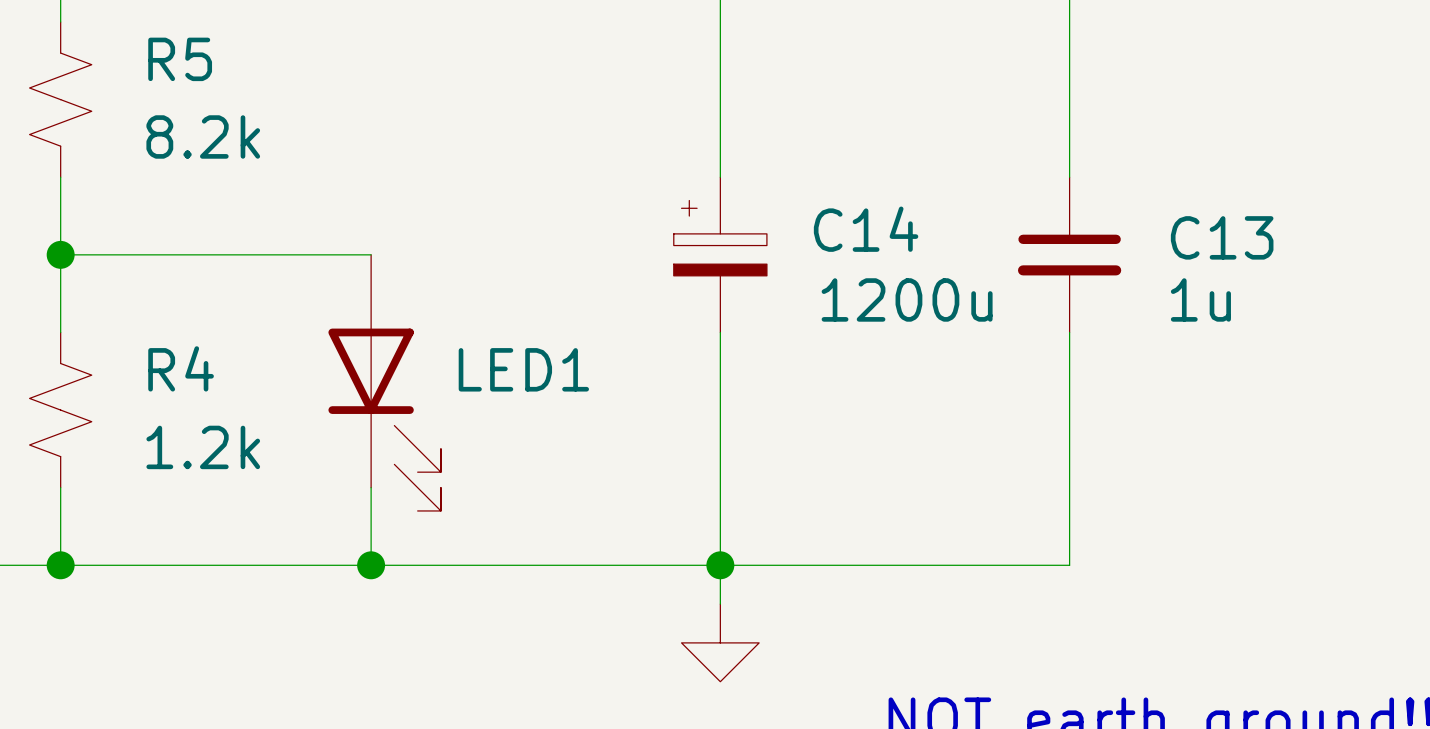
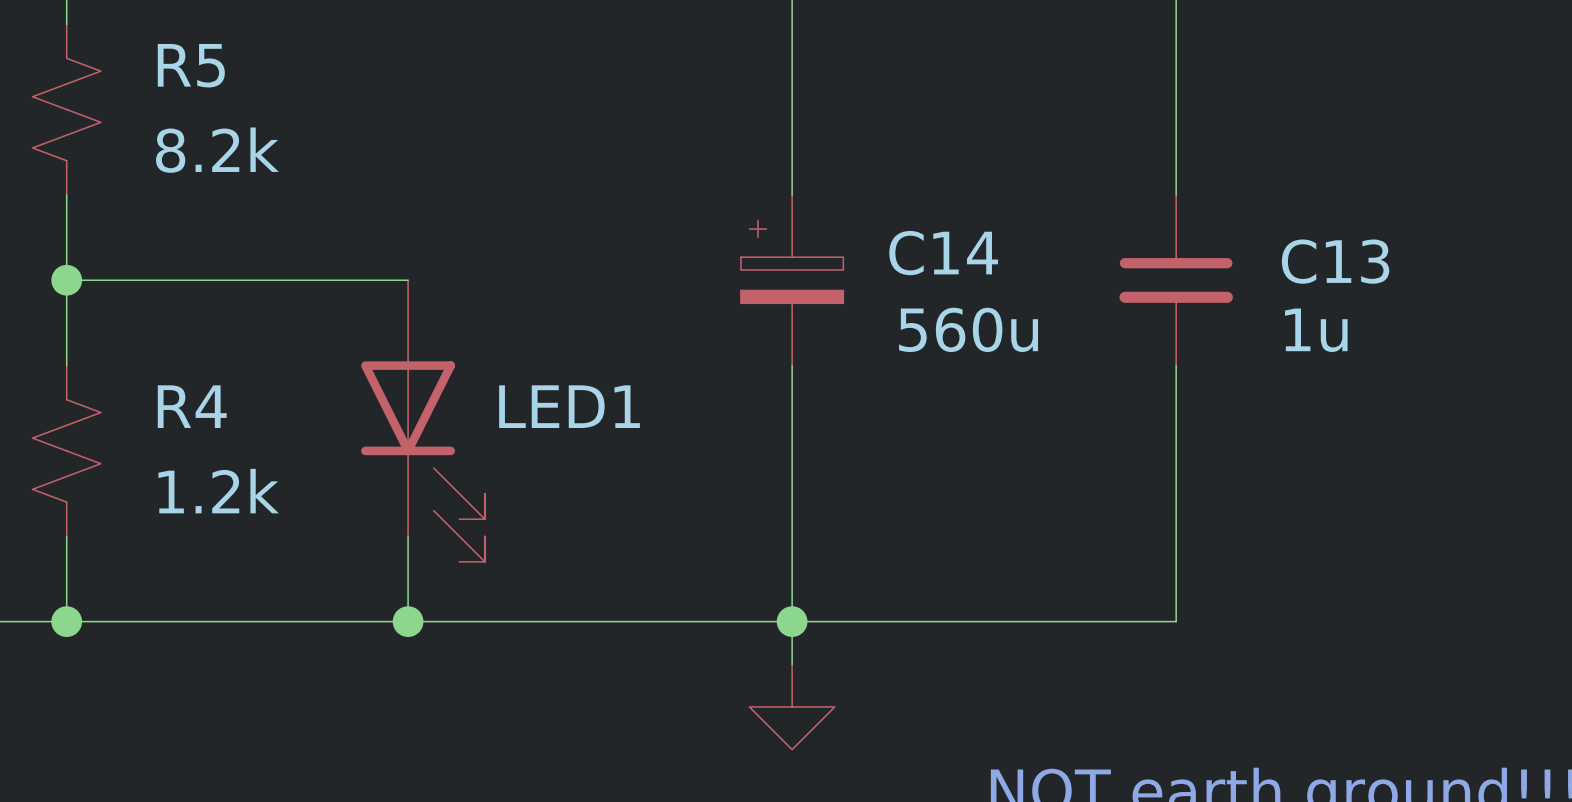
C14 value: 1200u (907, 299) -> 560u (968, 329)

